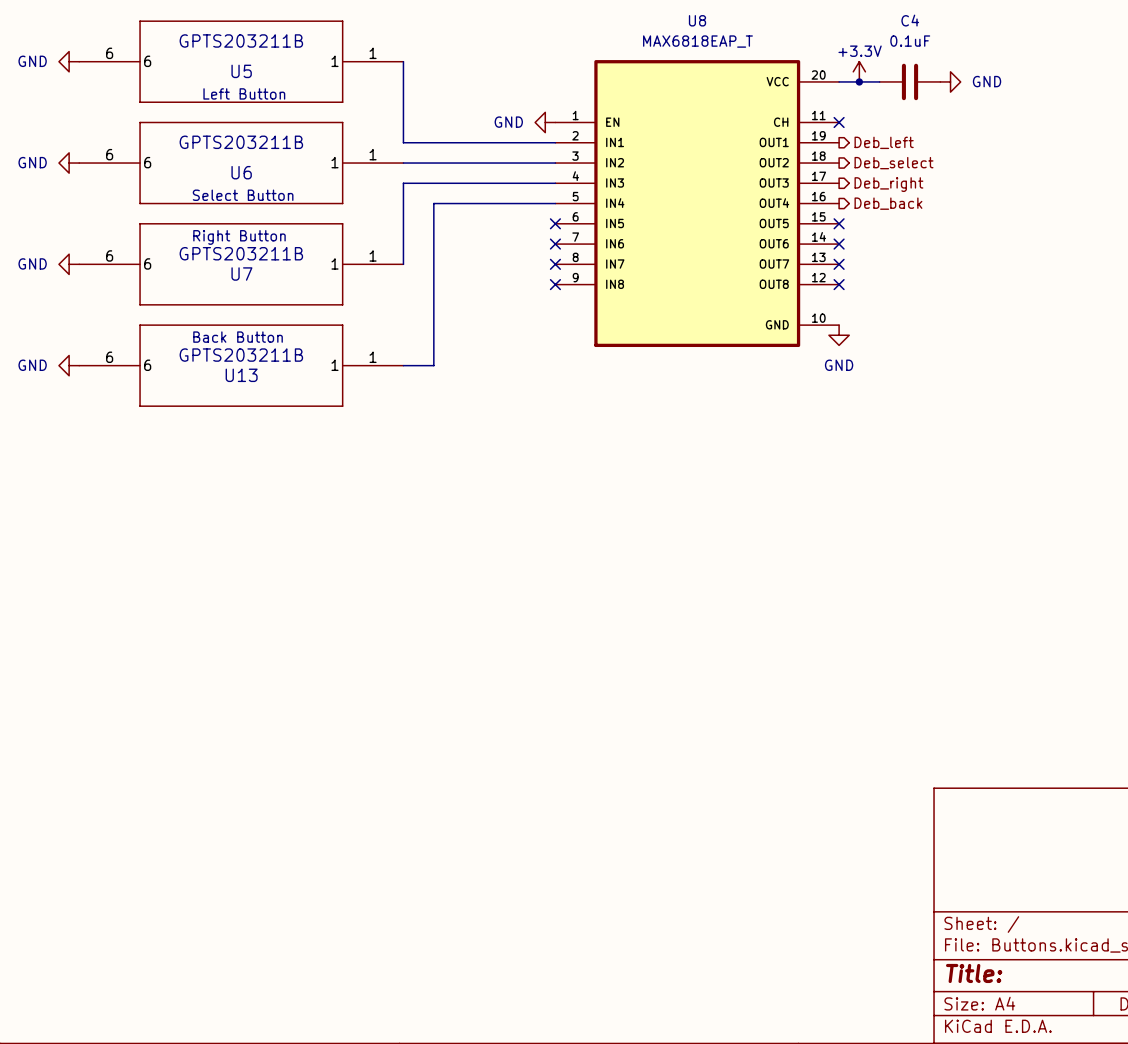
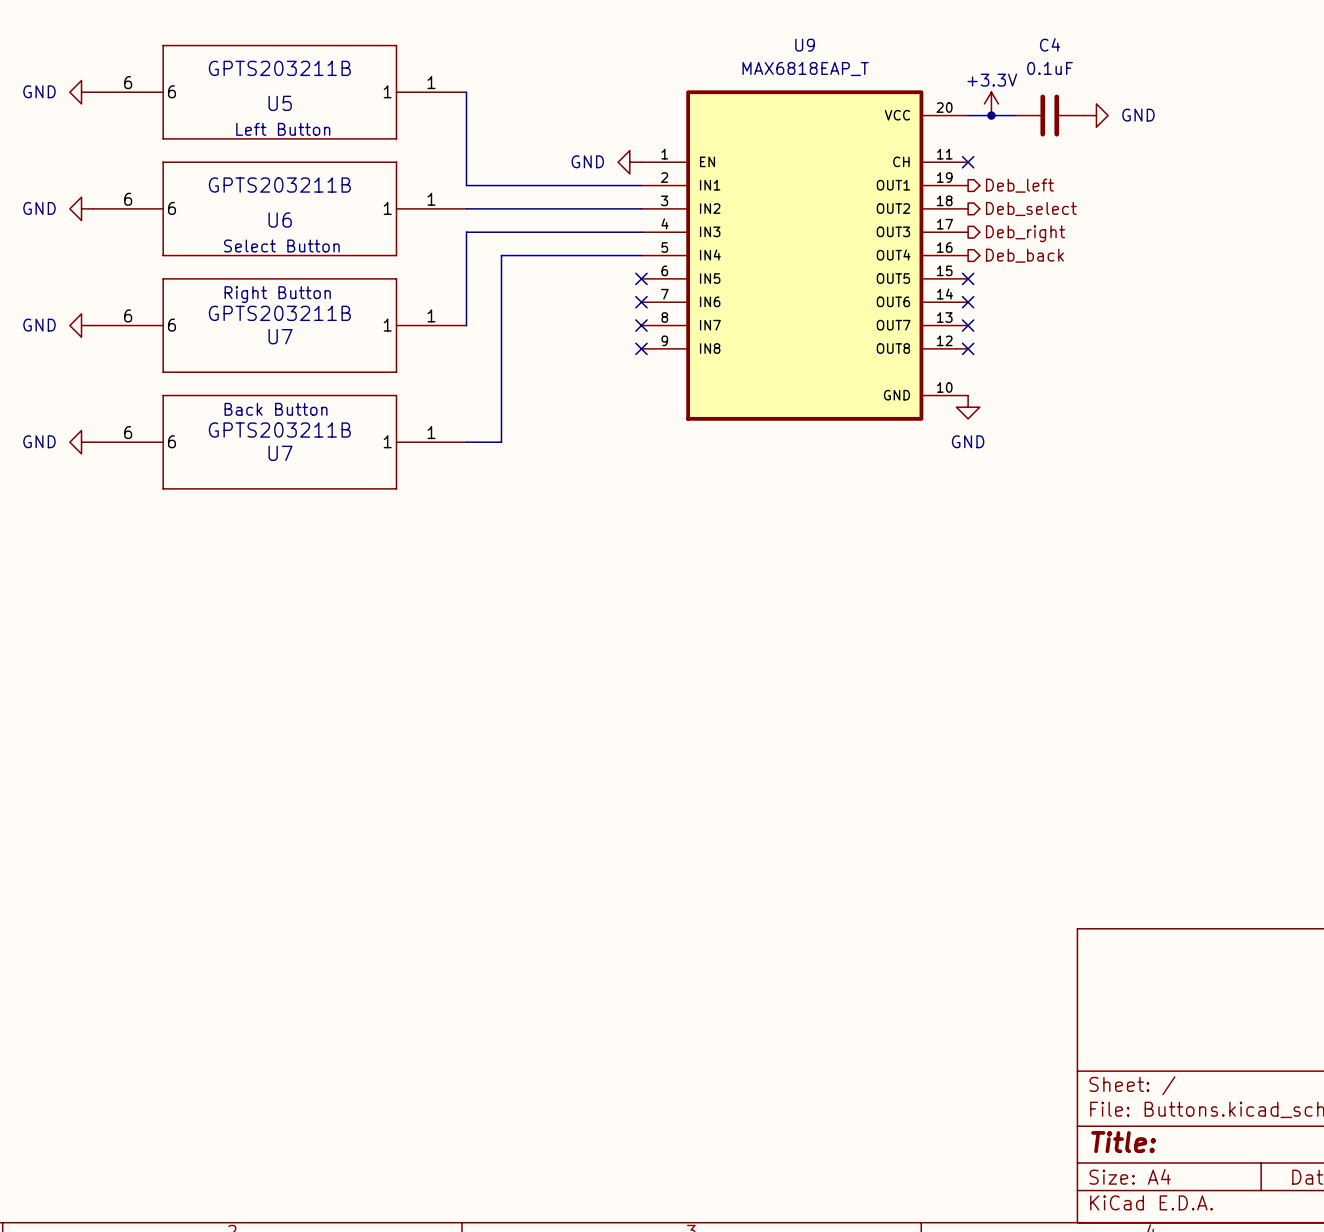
U8 name: U8 (697, 20) -> U9 (805, 45)
U13 name: U13 (241, 375) -> U7 (280, 453)

